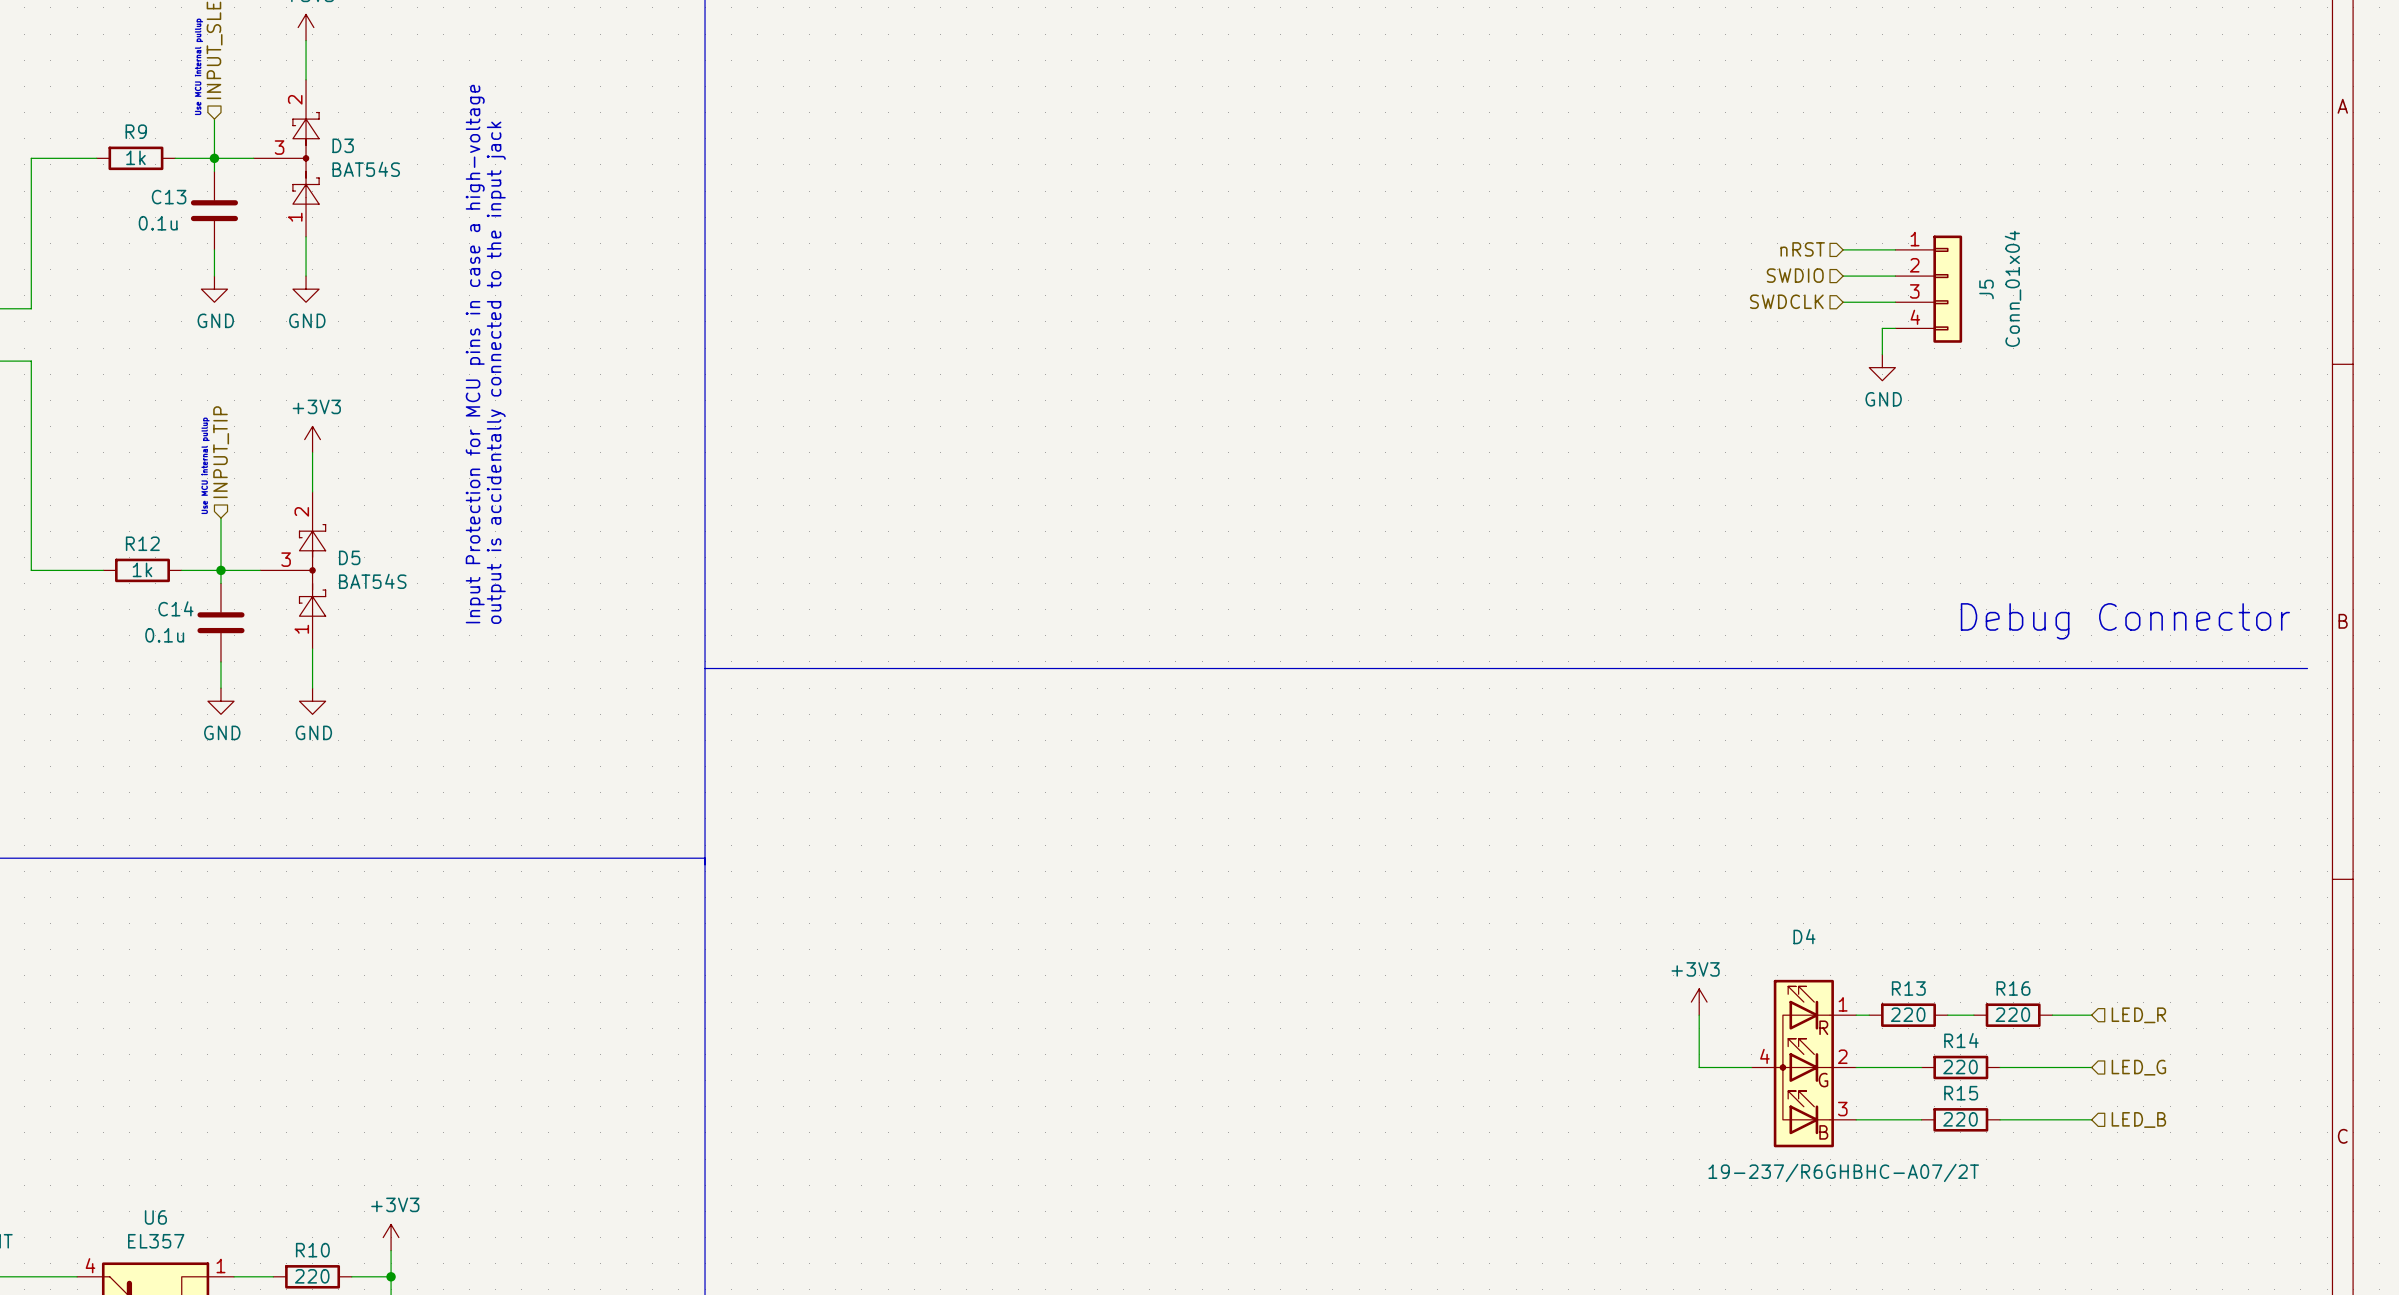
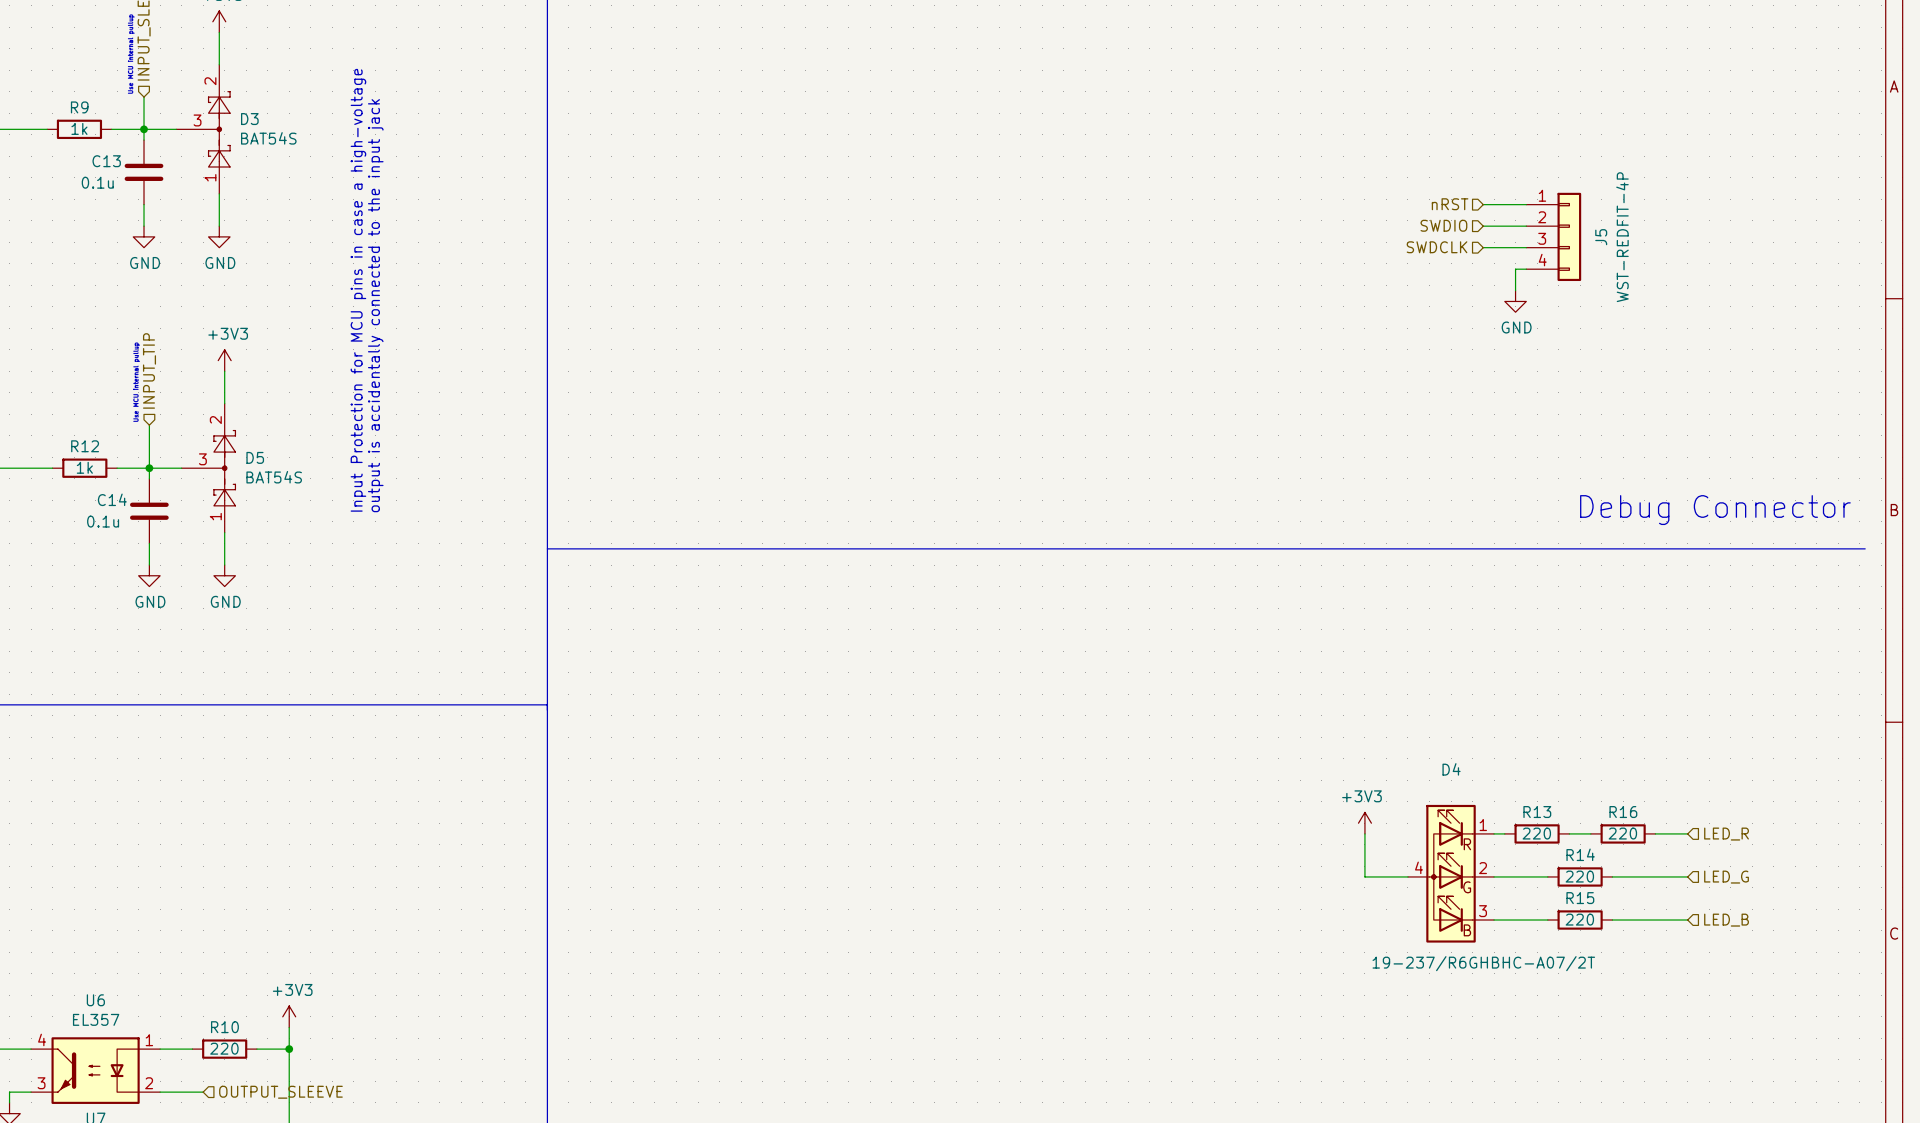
J5 value: Conn_01x04 (2012, 288) -> WST-REDFIT-4P (1622, 237)

